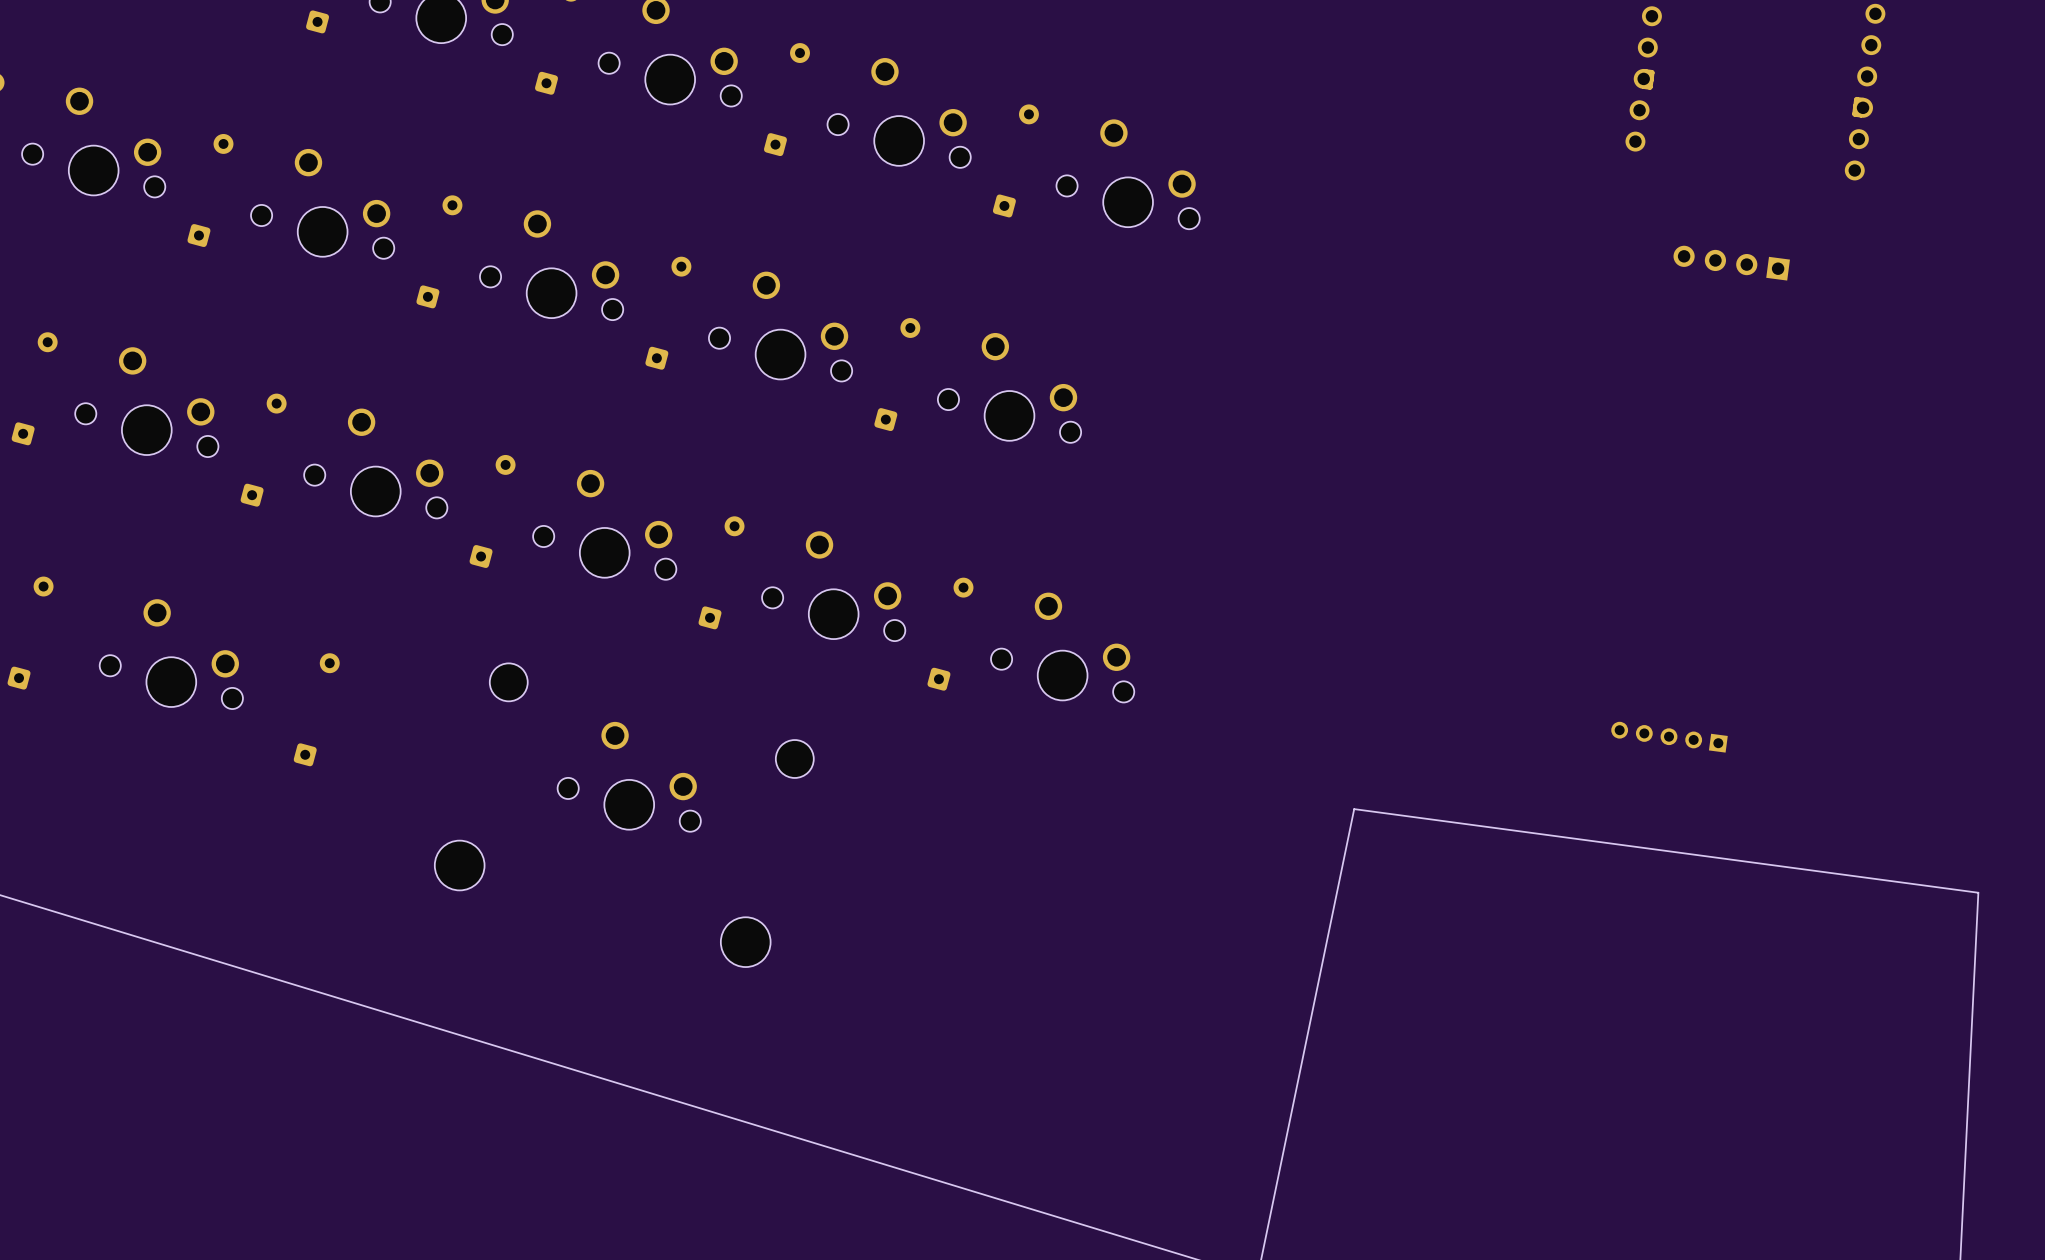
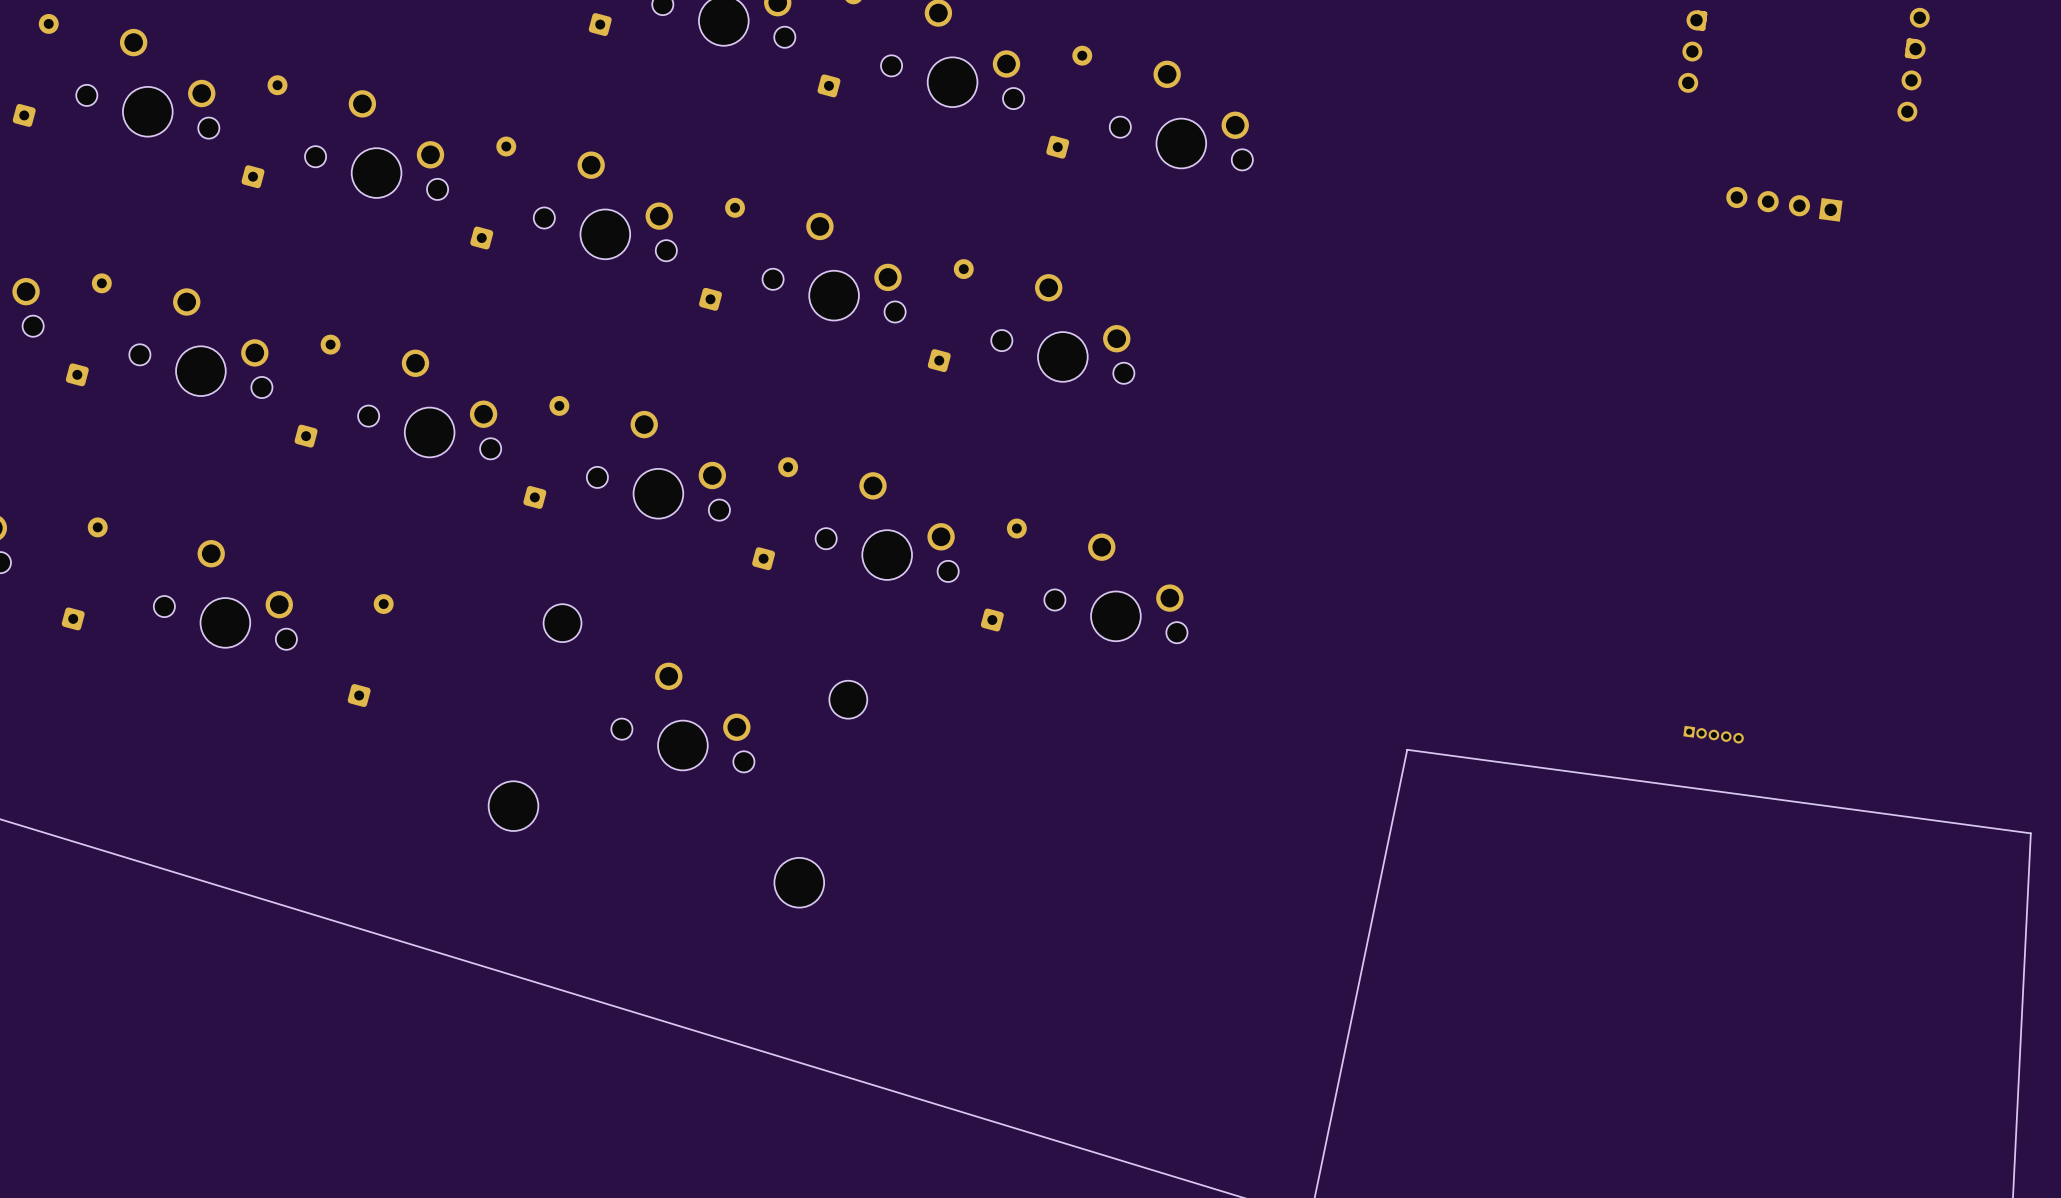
part: (1669, 737) -> none
part: none -> (1713, 734)

